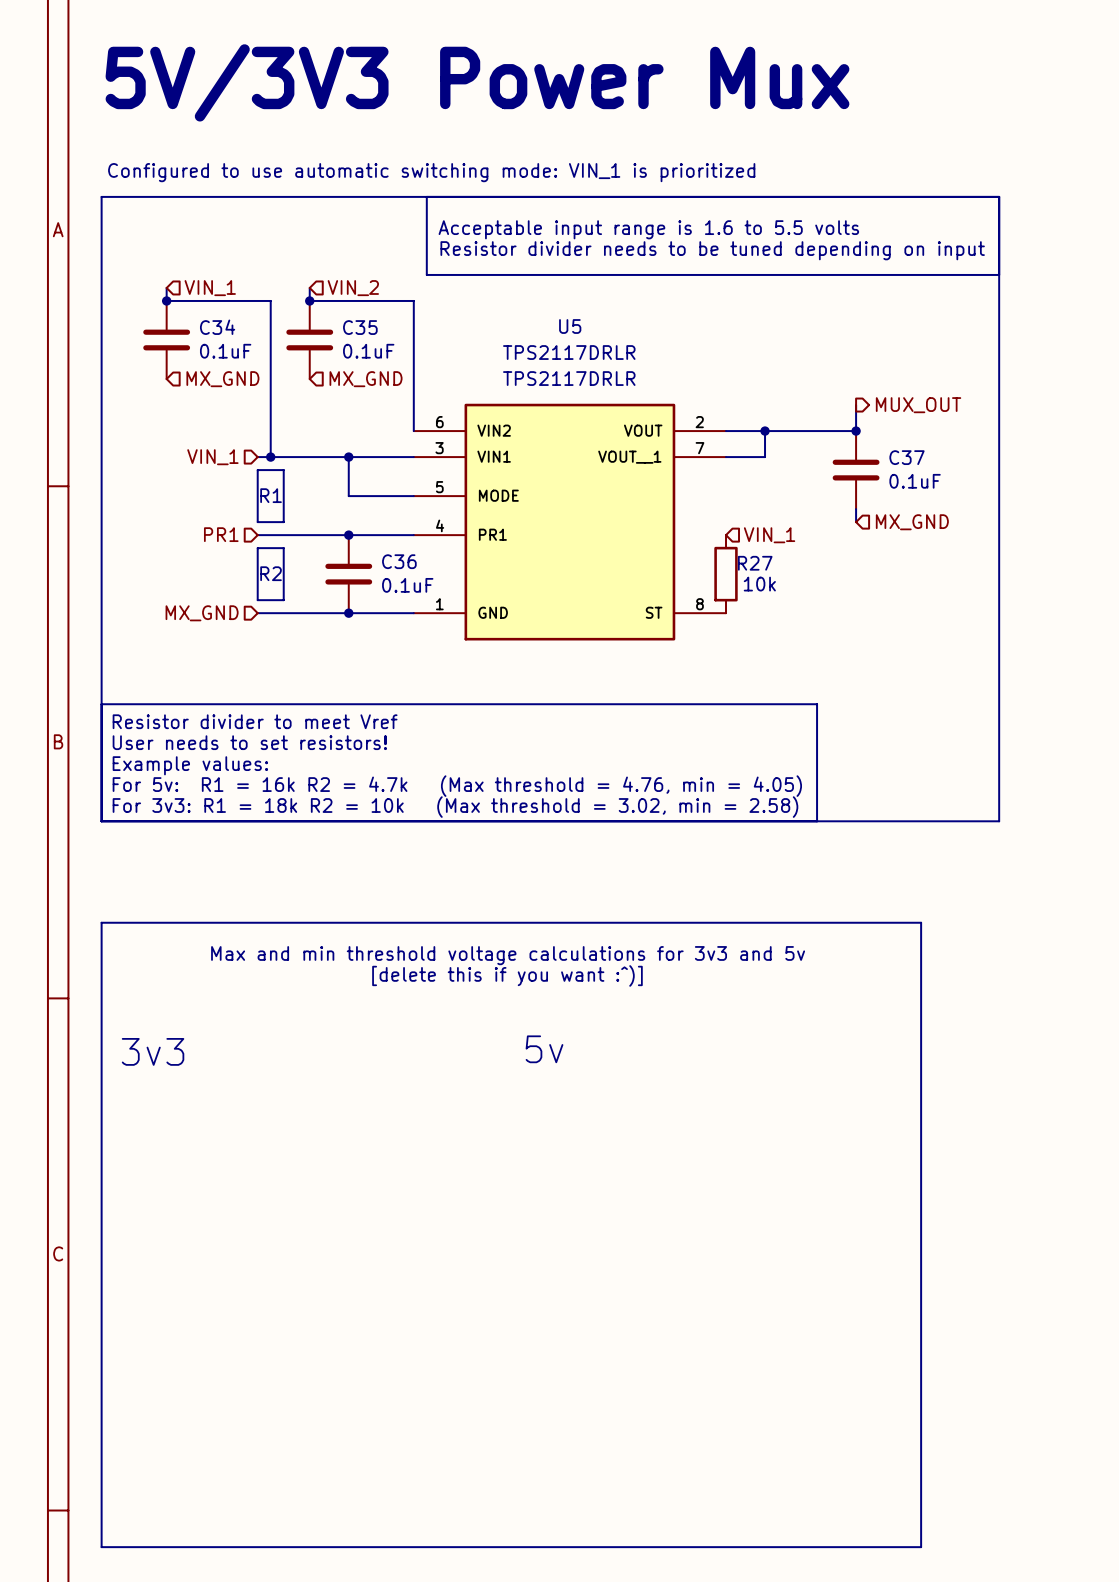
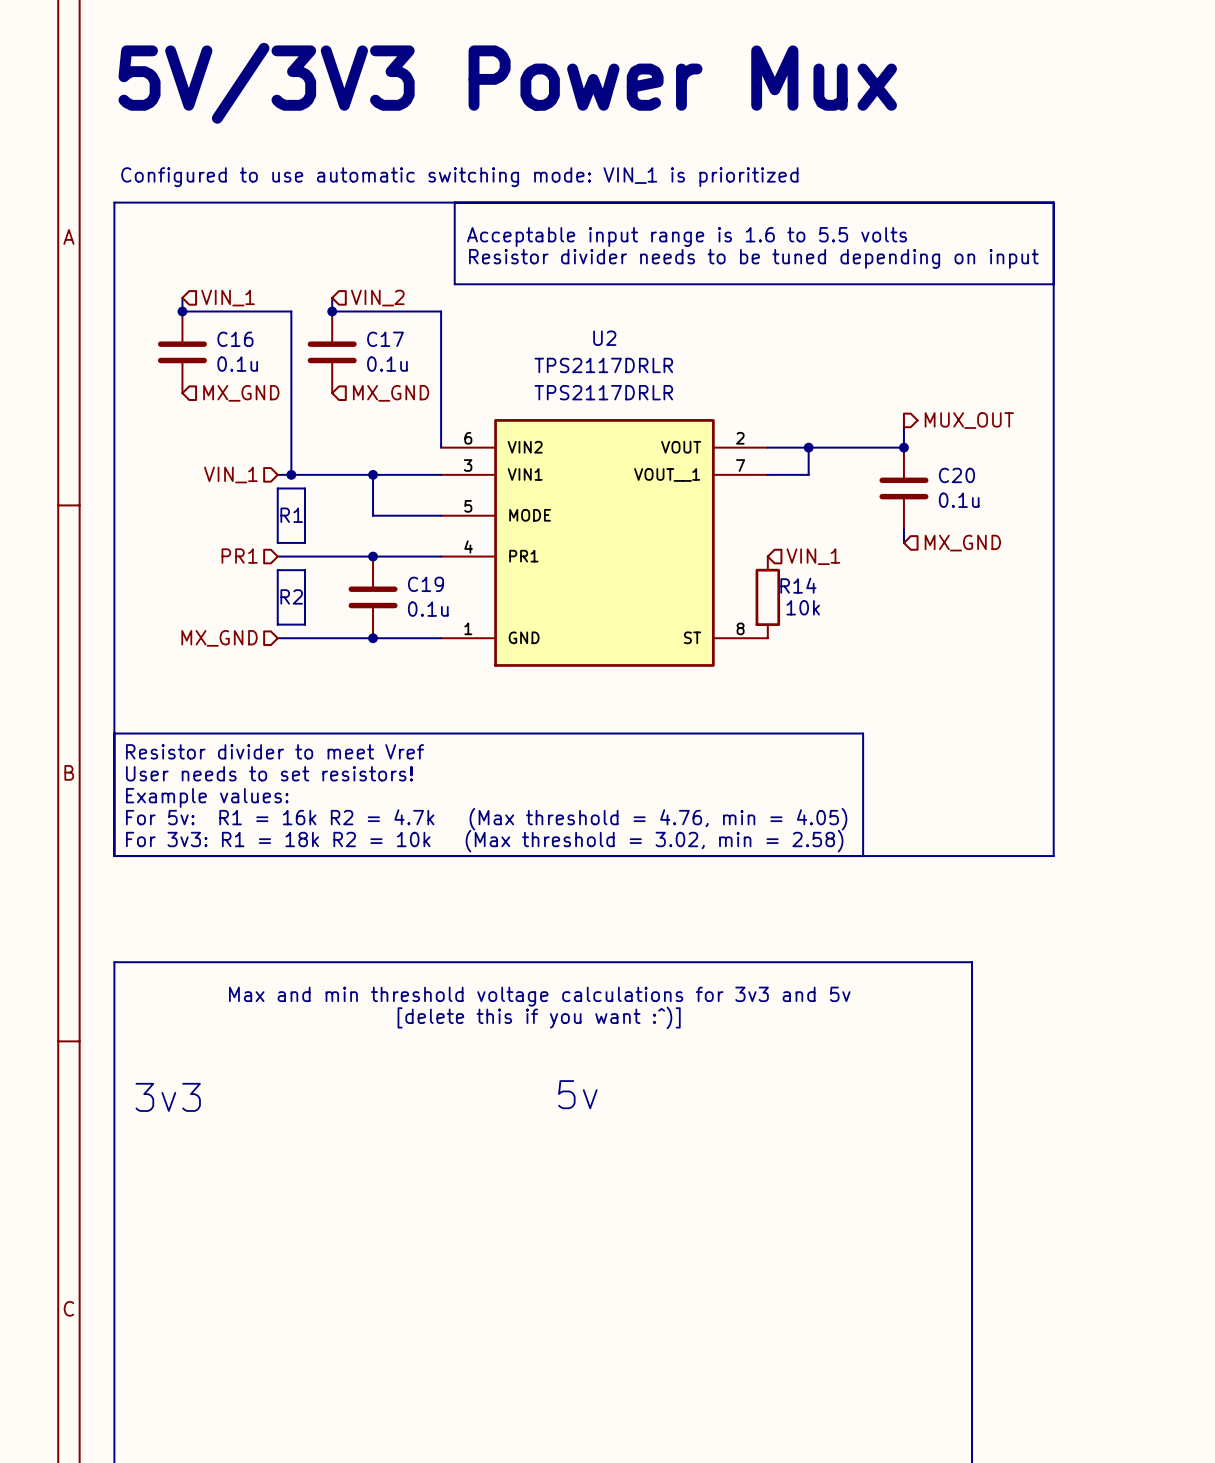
U5 name: U5 (570, 326) -> U2 (604, 338)
C34 name: C34 (217, 327) -> C16 (235, 339)
C35 name: C35 (360, 327) -> C17 (385, 339)
C34 value: 0.1uF (225, 351) -> 0.1u (237, 364)
C35 value: 0.1uF (368, 351) -> 0.1u (387, 364)
C37 name: C37 (907, 457) -> C20 (956, 475)
C37 value: 0.1uF (915, 481) -> 0.1u (959, 500)
C36 name: C36 (399, 561) -> C19 (426, 584)
R27 name: R27 (755, 563) -> R14 (798, 585)
C36 value: 0.1uF (407, 585) -> 0.1u (428, 609)

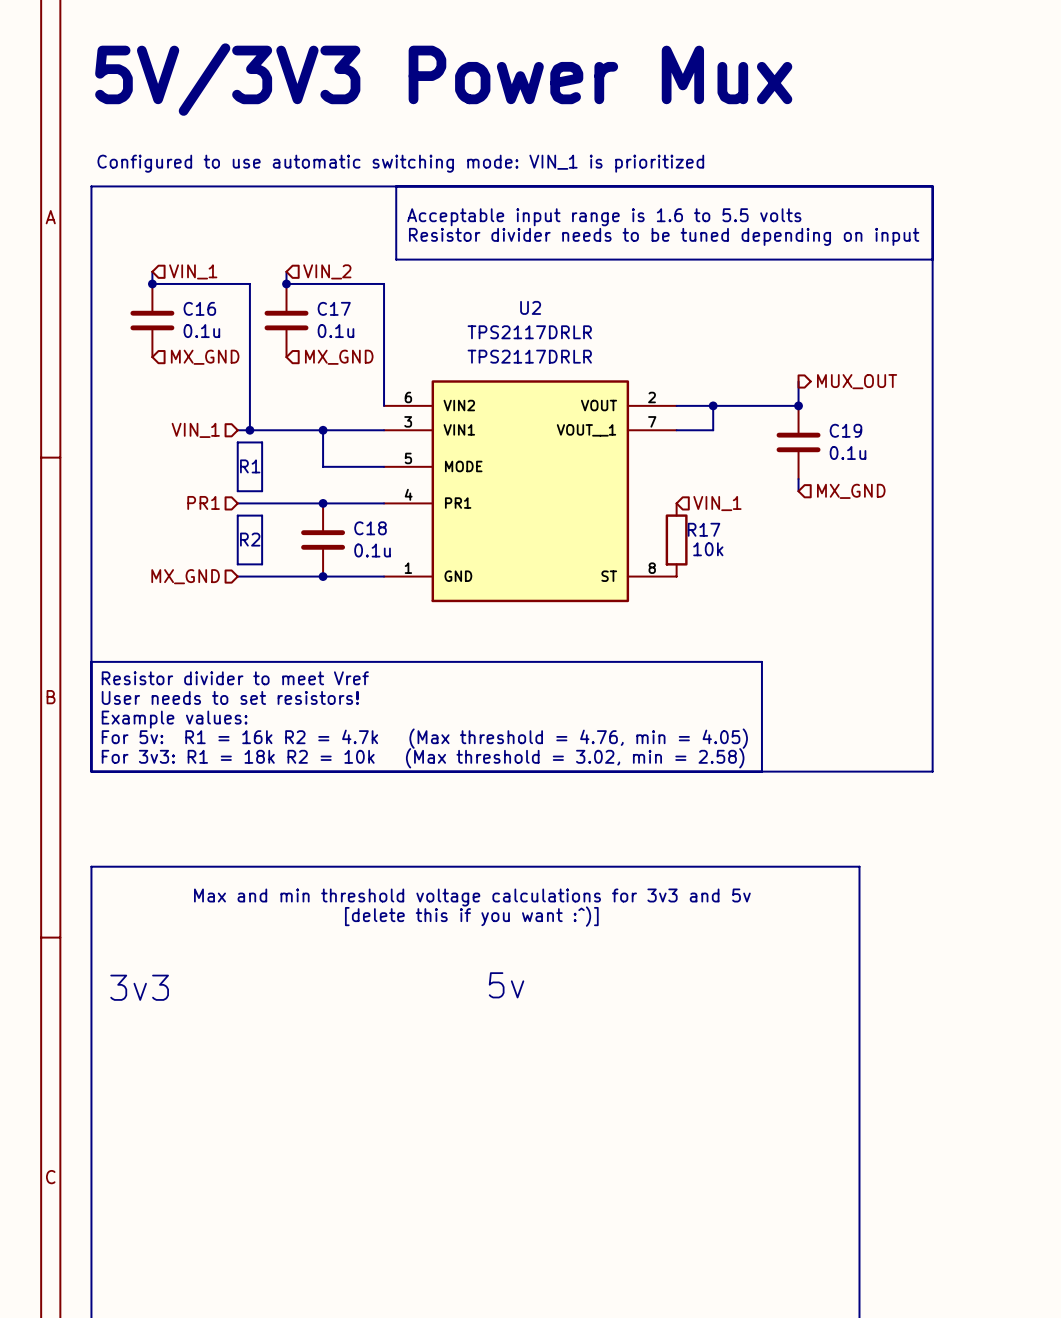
C20 name: C20 (956, 475) -> C19 (845, 430)
C19 name: C19 (426, 584) -> C18 (370, 528)
R14 name: R14 (798, 585) -> R17 (704, 529)

